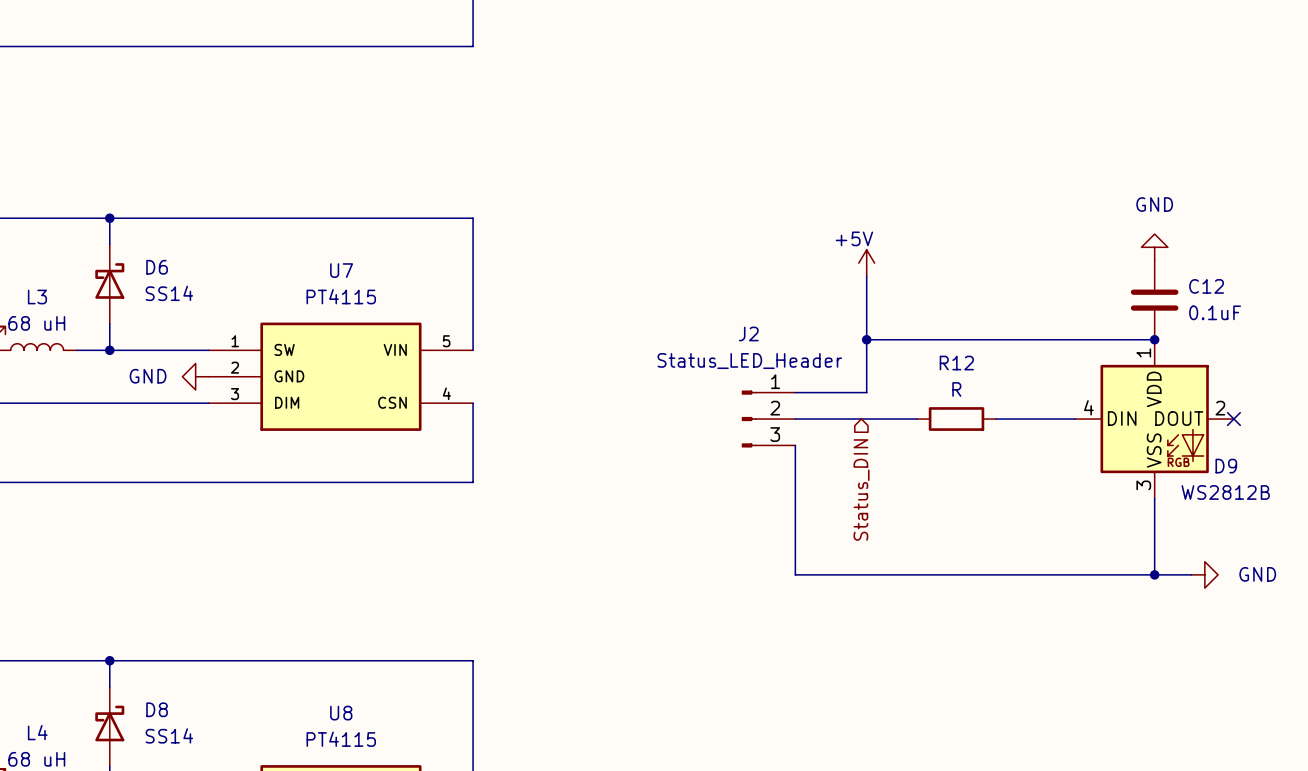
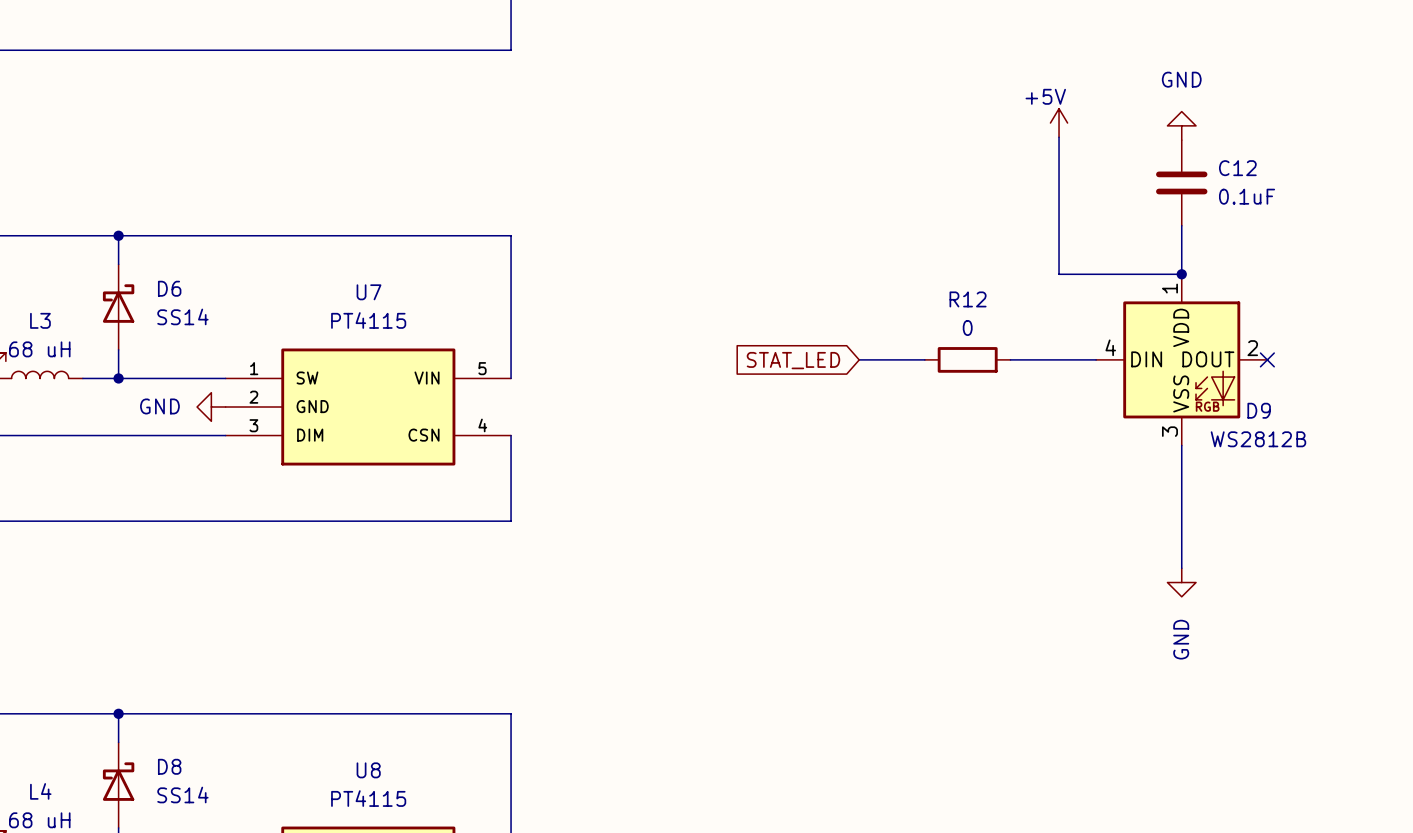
wire: none -> (1059, 137) (1059, 274) (1181, 274) (1181, 225)
power symbol position: GND (1154, 247) -> GND (1181, 125)
junction: none -> (1181, 274)
power symbol position: +5V (866, 263) -> +5V (1059, 123)
wire: (866, 276) (866, 392) (795, 392) -> none
C12 position: (1154, 300) -> (1181, 182)
global label: none -> STAT_LED (793, 360)
wire: none -> (859, 359) (924, 359)
no-connect mark: none -> (1267, 359)
wire: (866, 339) (1154, 339) -> none
junction: (866, 339) -> none
junction: (1154, 339) -> none
R12 value: R (956, 389) -> 0 (967, 327)
wire: none -> (1181, 445) (1181, 568)
J2: Status_LED_Header (768, 419) -> none
wire: (795, 419) (916, 419) -> none
R12 position: (956, 419) -> (967, 359)
wire: (996, 419) (1075, 419) -> (1010, 359) (1096, 359)
D9 position: (1154, 419) -> (1181, 359)
no-connect mark: (1233, 419) -> none
wire: (795, 445) (795, 574) (1191, 574) -> none
hierarchical label: Status_DIN (861, 489) -> none
wire: (1154, 498) (1154, 574) -> none
junction: (1154, 574) -> none
power symbol rotation: 0° (1204, 574) -> 90° clockwise (1181, 582)
power symbol position: GND (1204, 574) -> GND (1181, 582)

